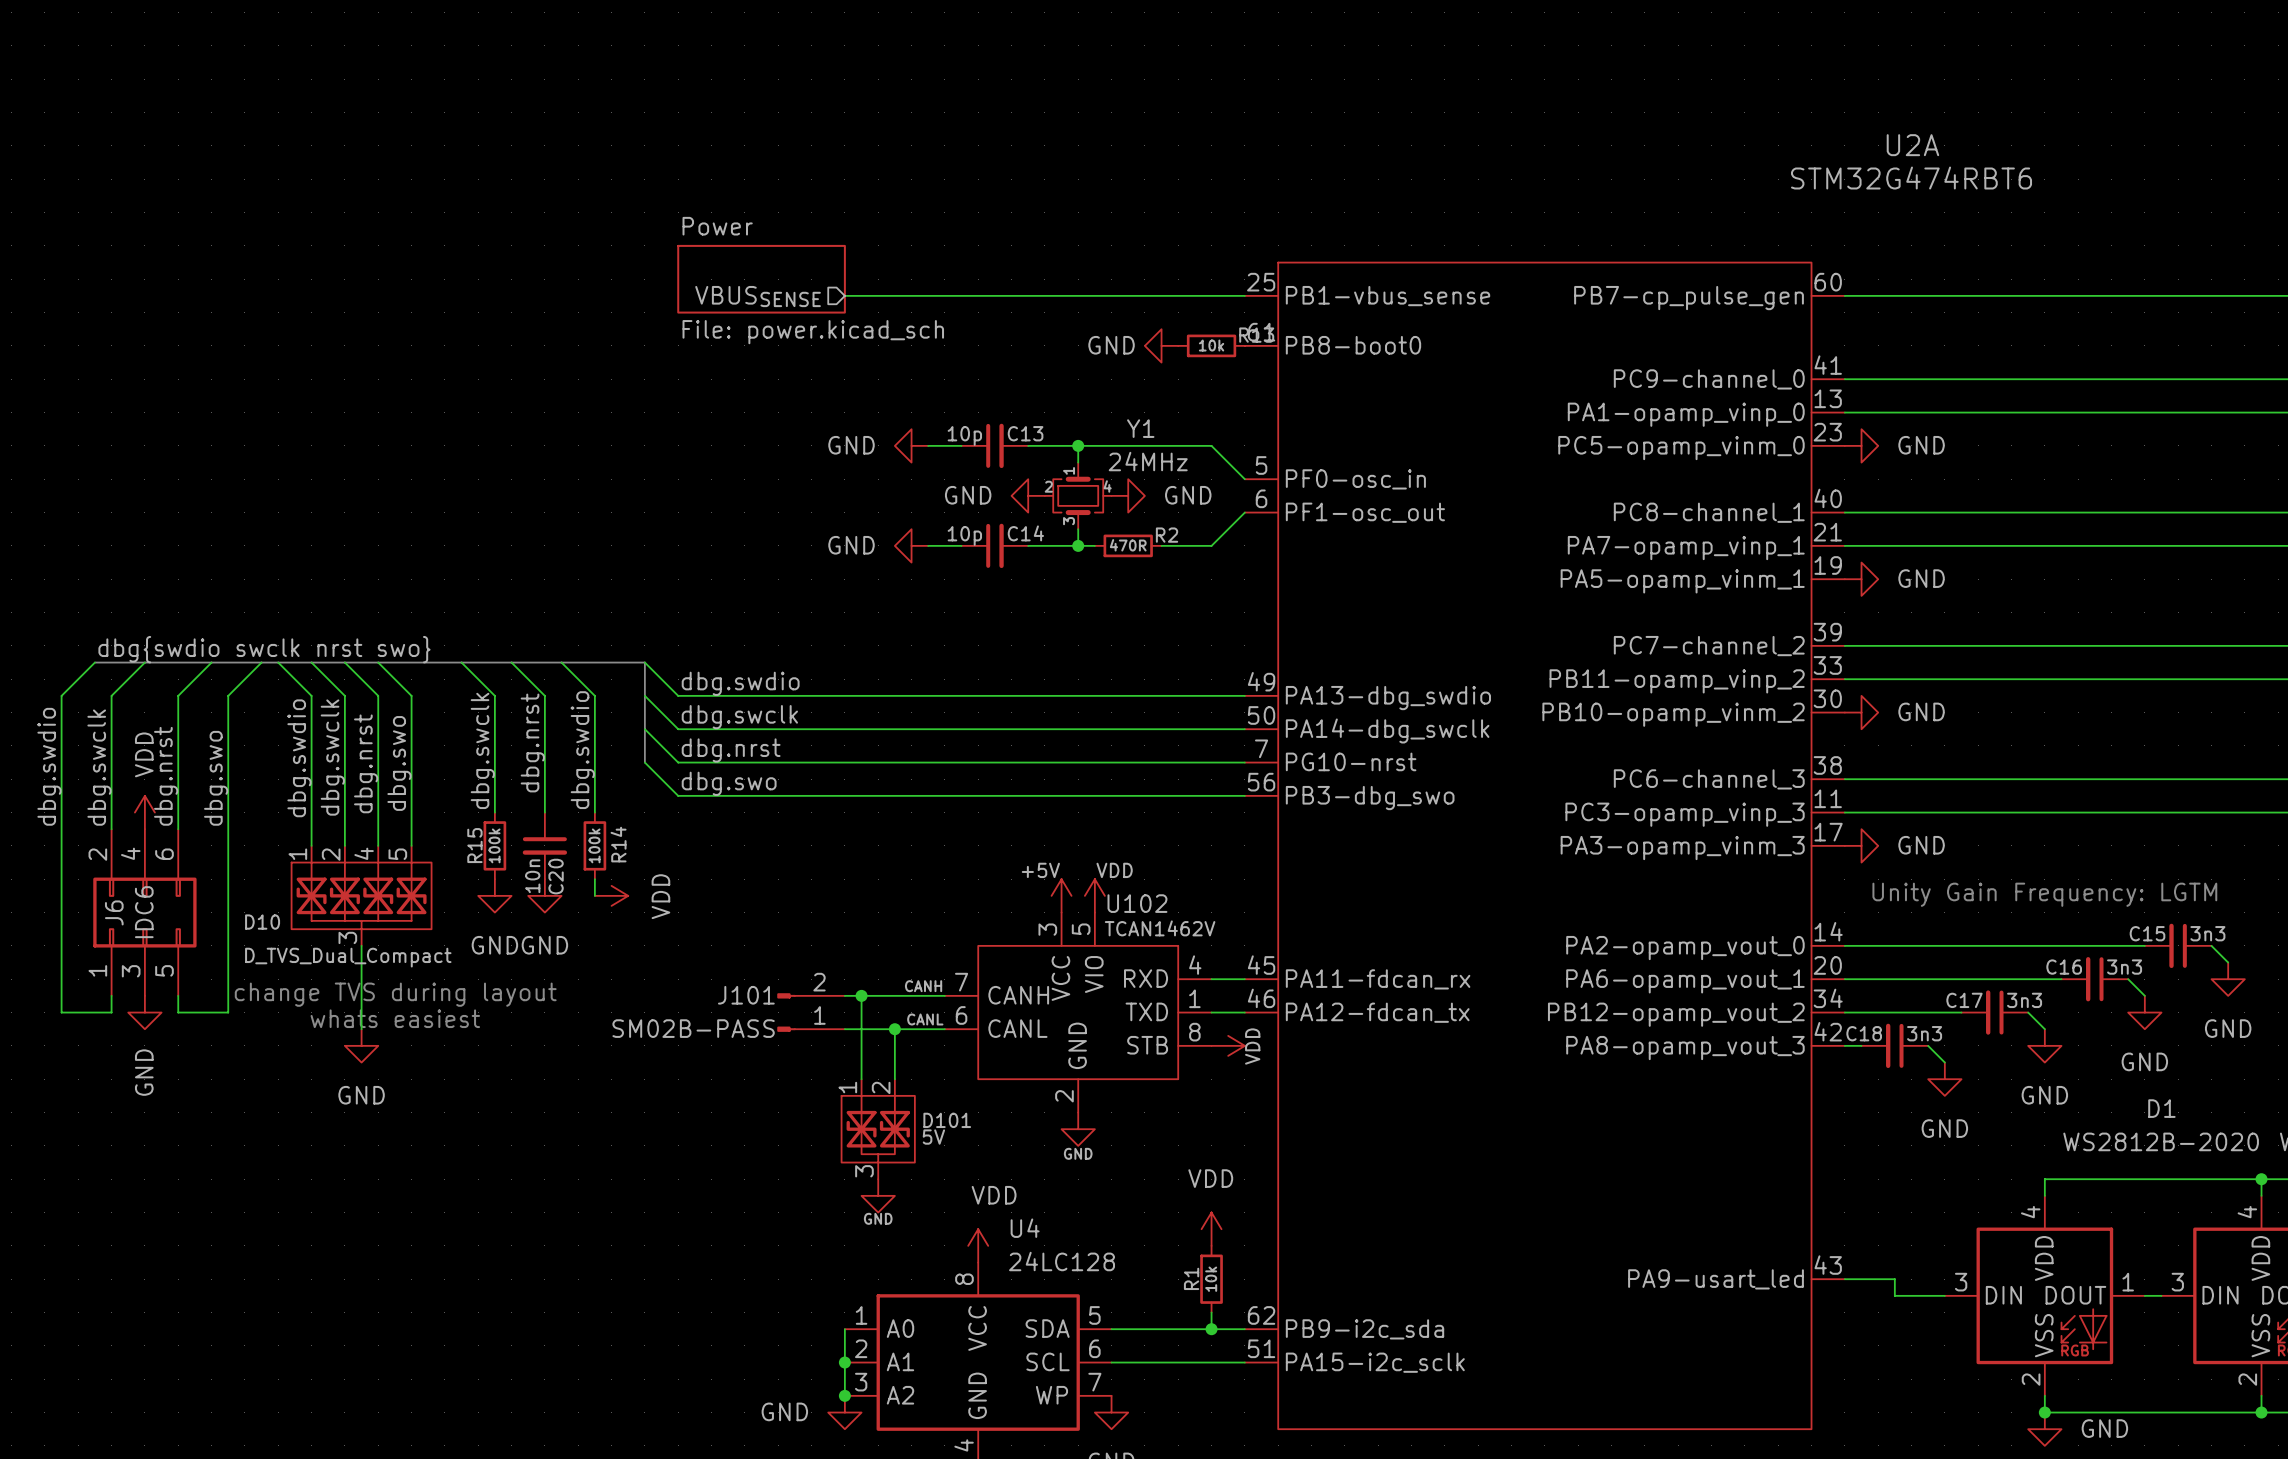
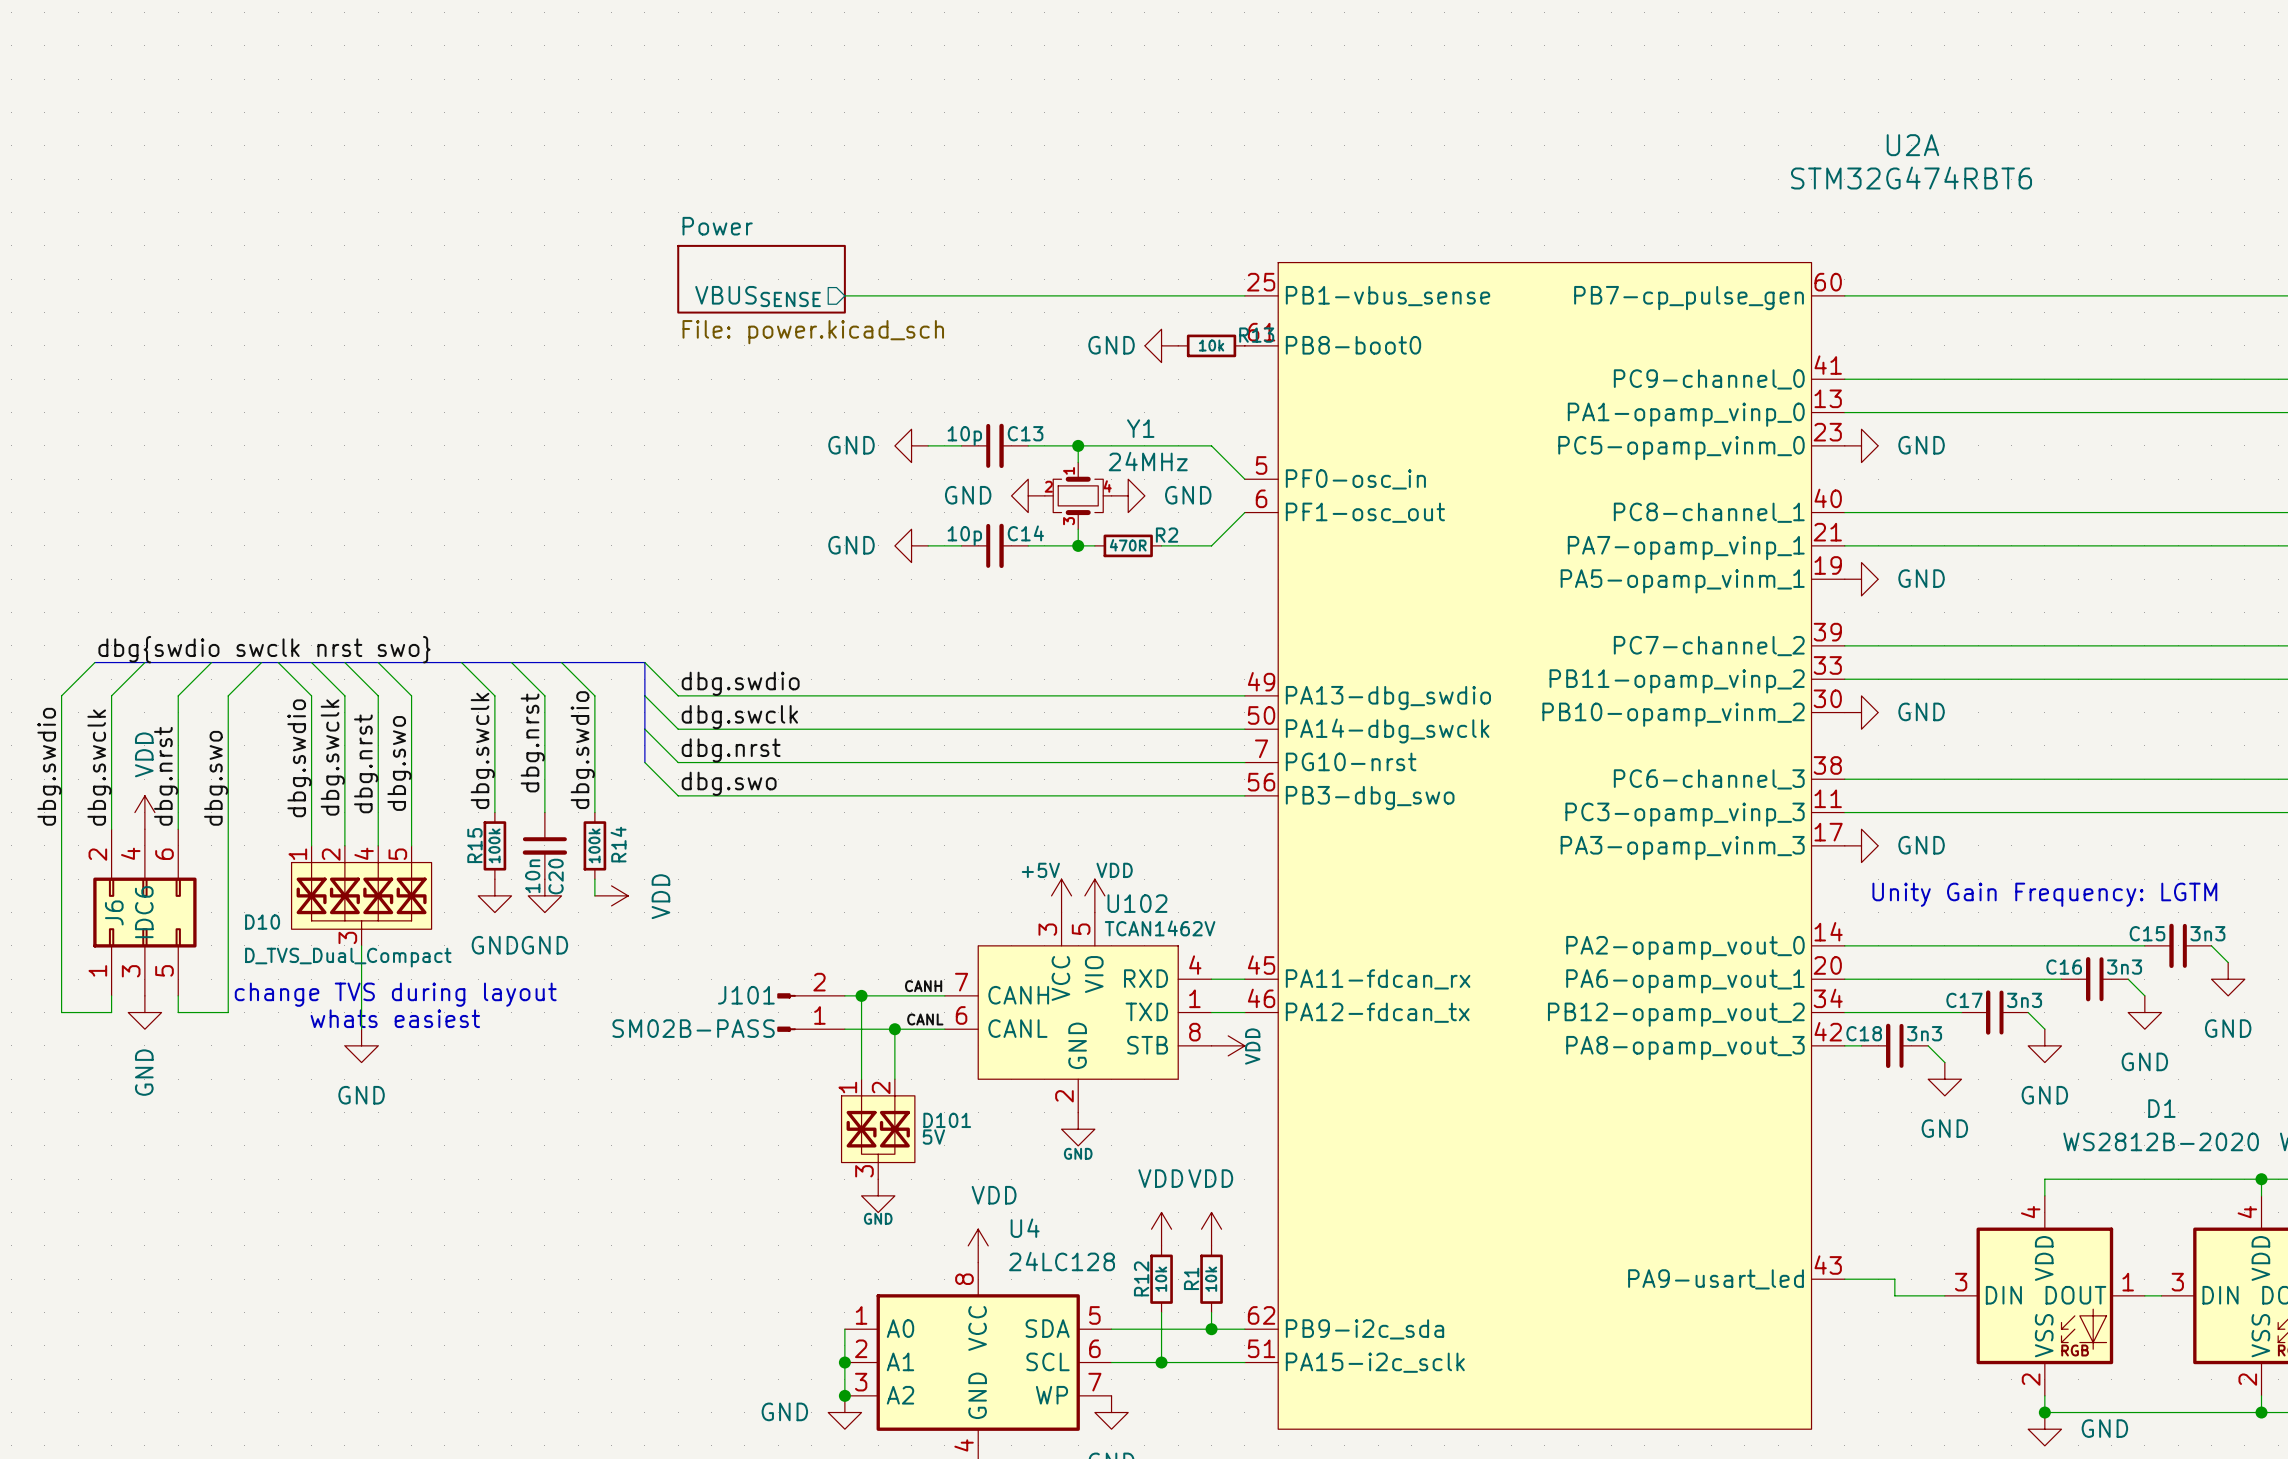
power symbol: none -> VDD (1161, 1229)
R12: none -> 10k (1161, 1279)
wire: none -> (1161, 1312) (1161, 1362)
junction: none -> (1161, 1362)

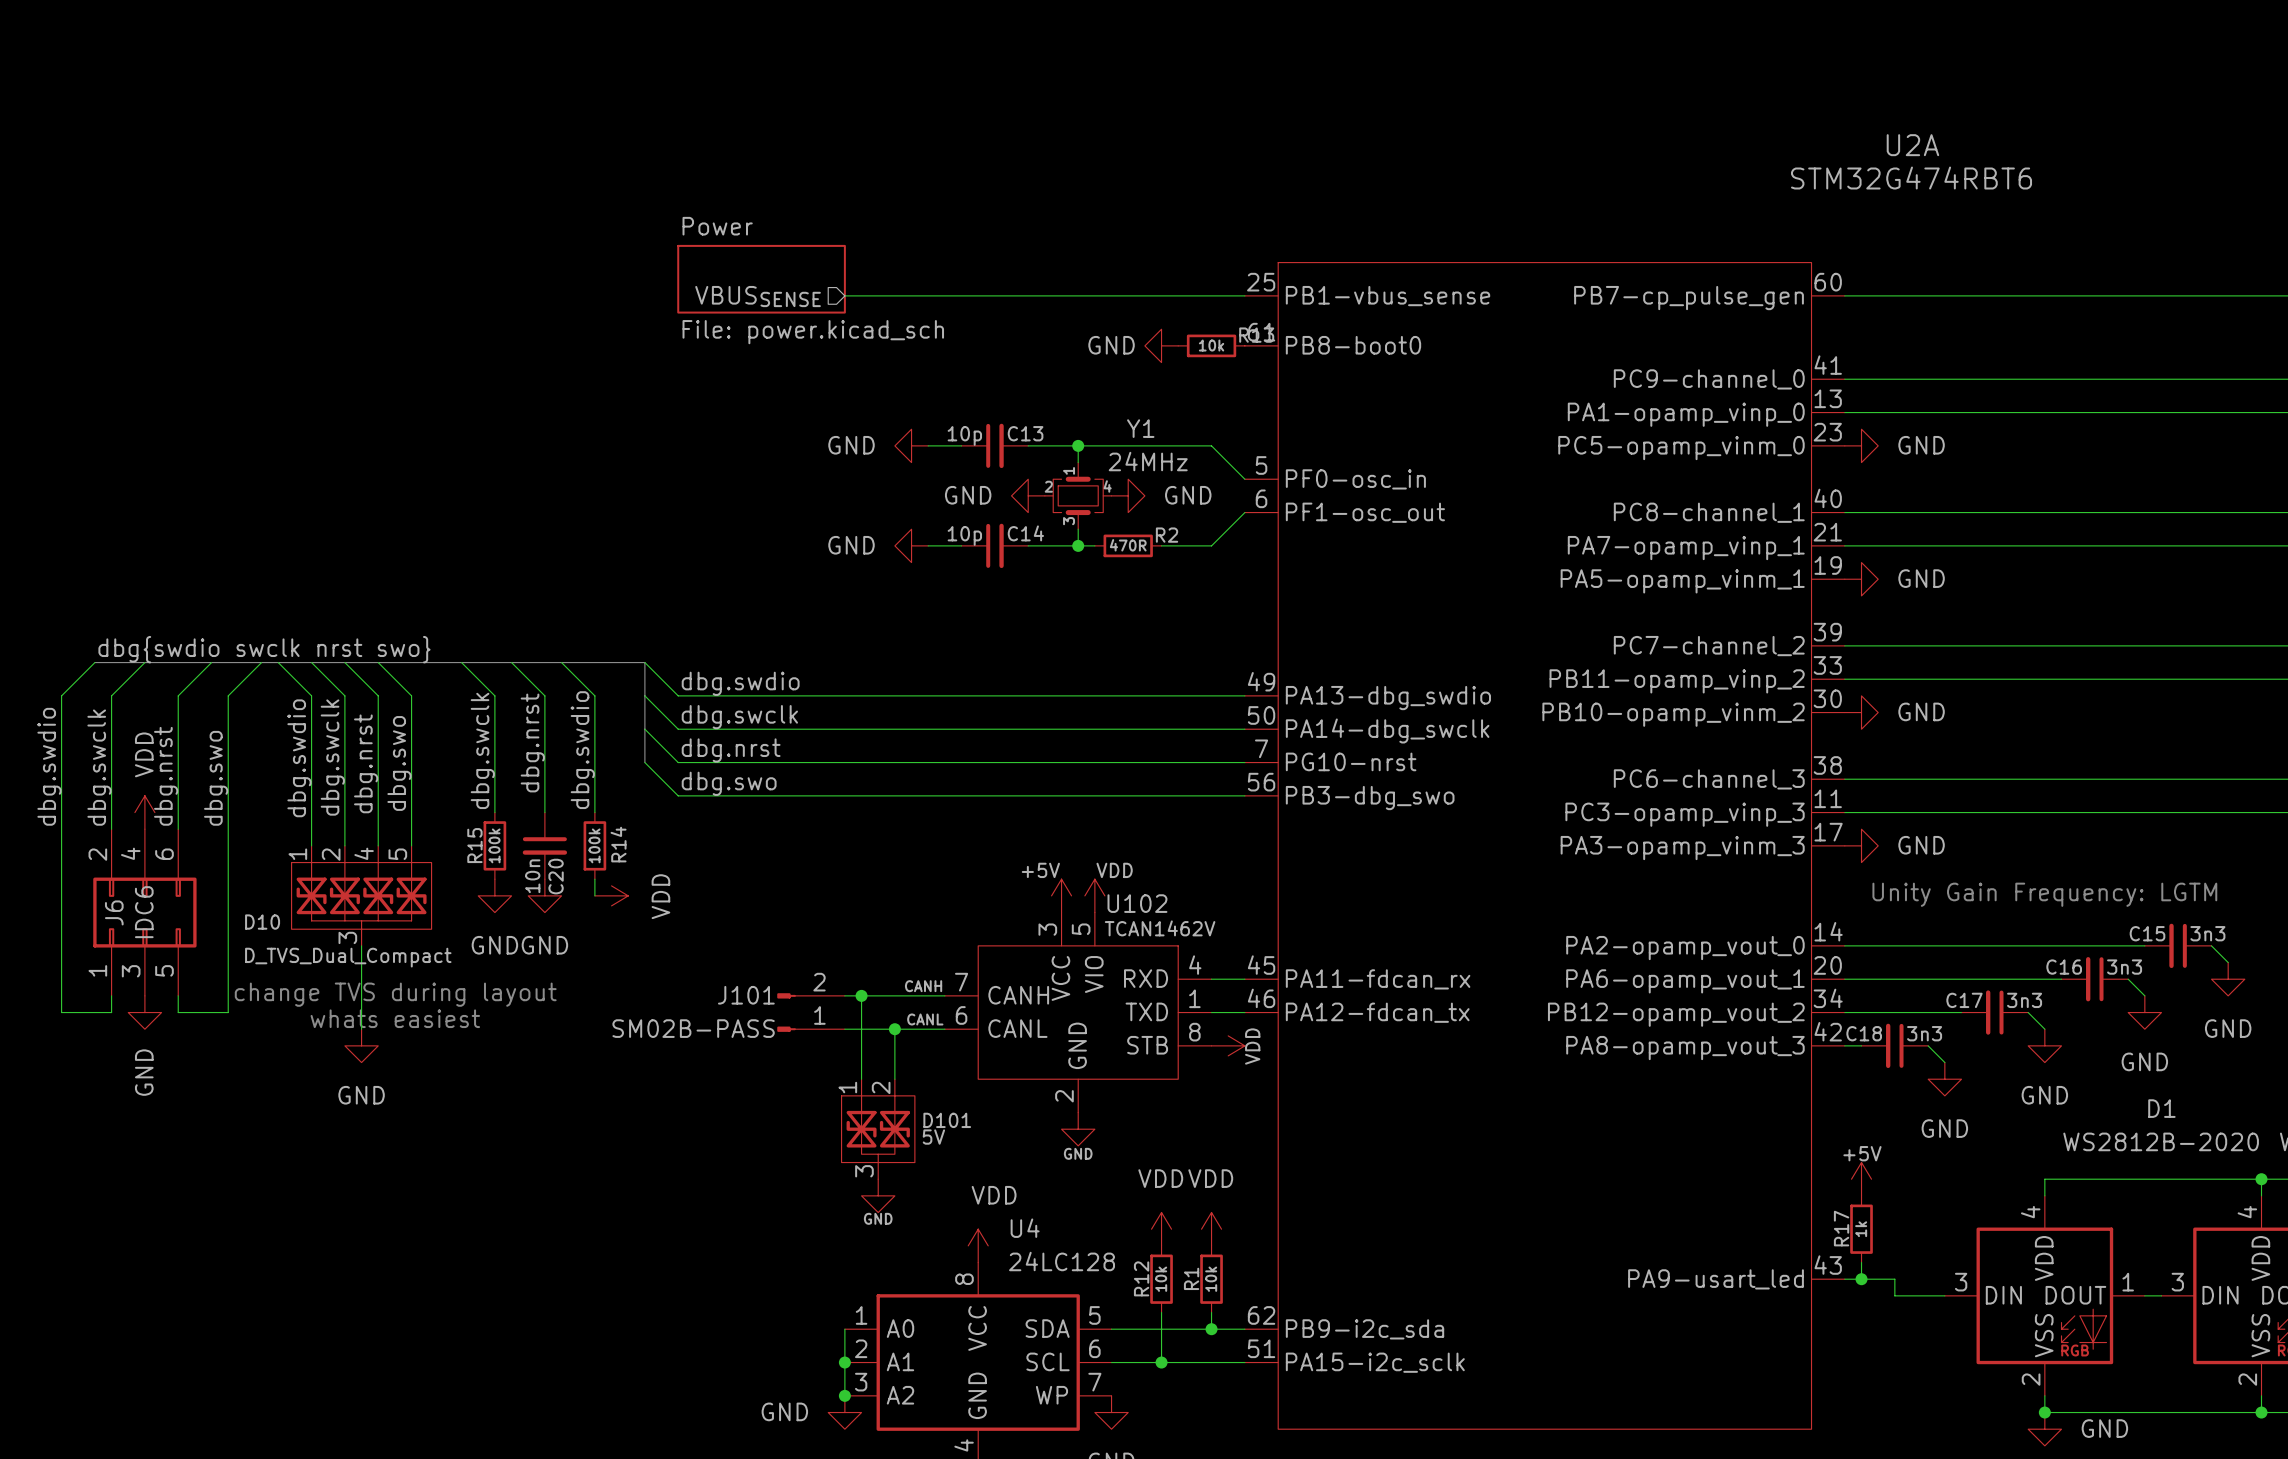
power symbol: none -> +5V (1861, 1179)
R17: none -> 1k (1861, 1229)
wire: none -> (1861, 1262) (1861, 1279)
junction: none -> (1861, 1279)

